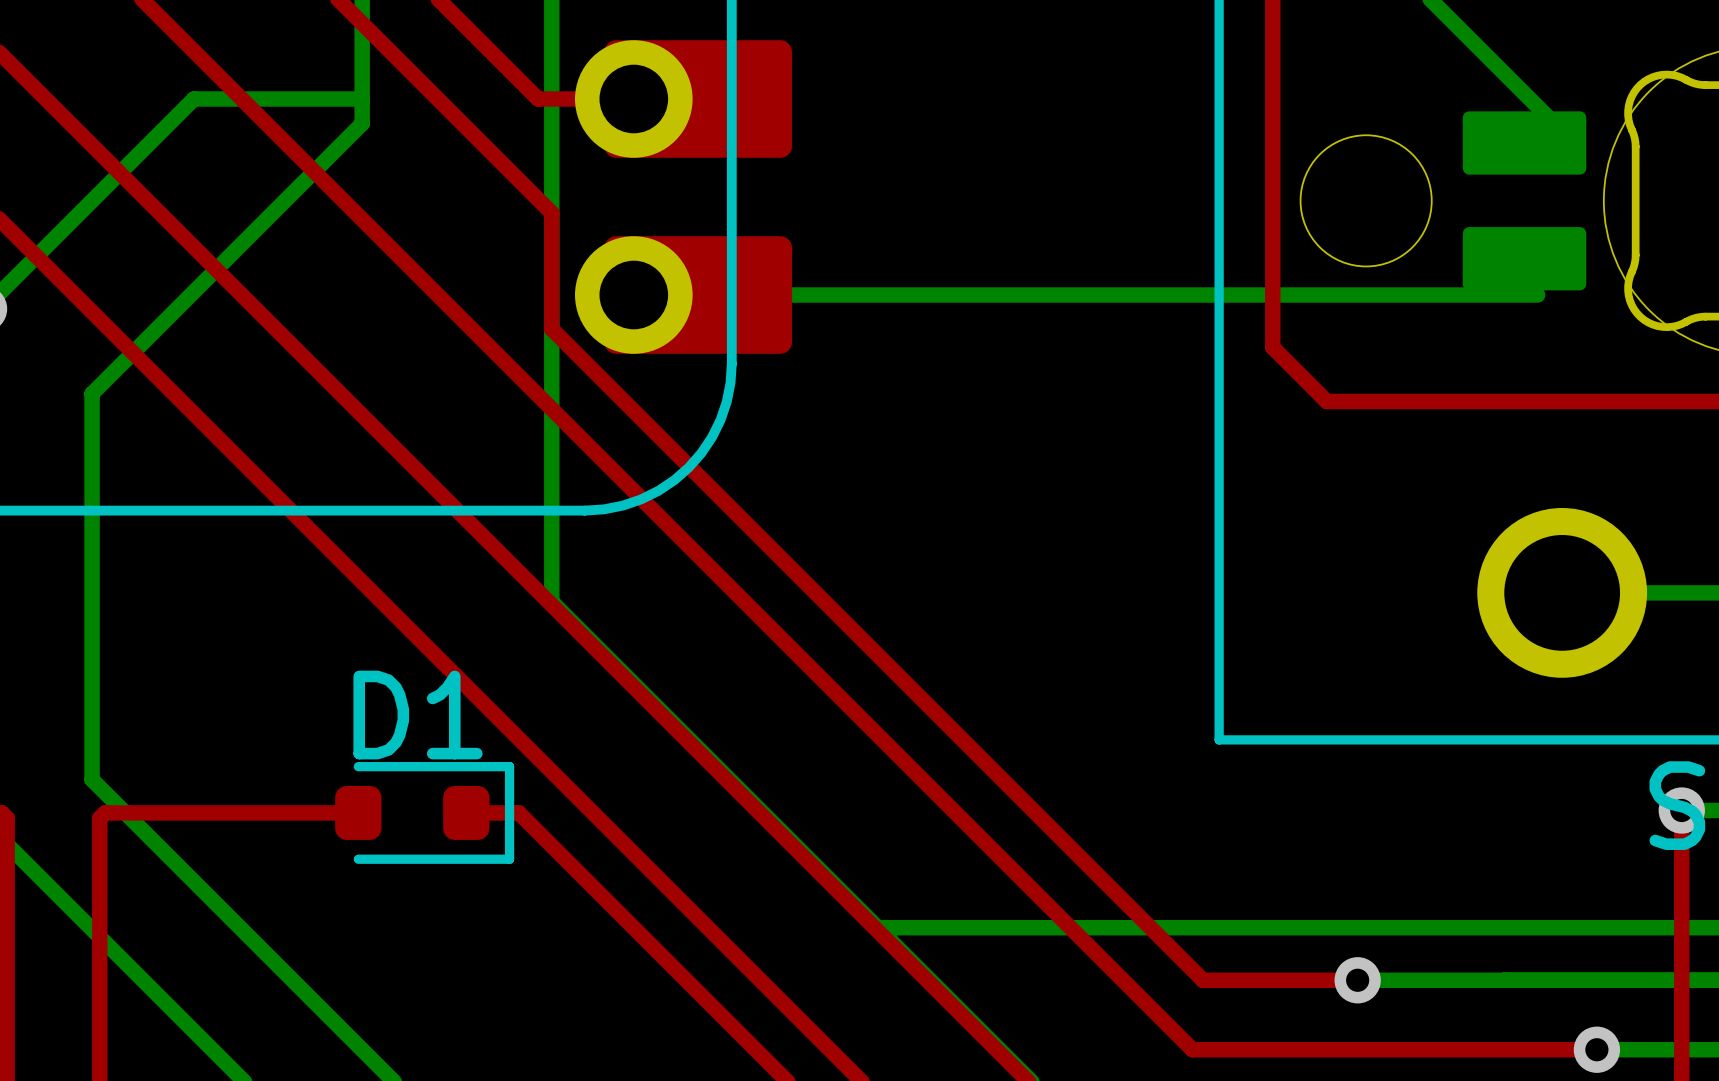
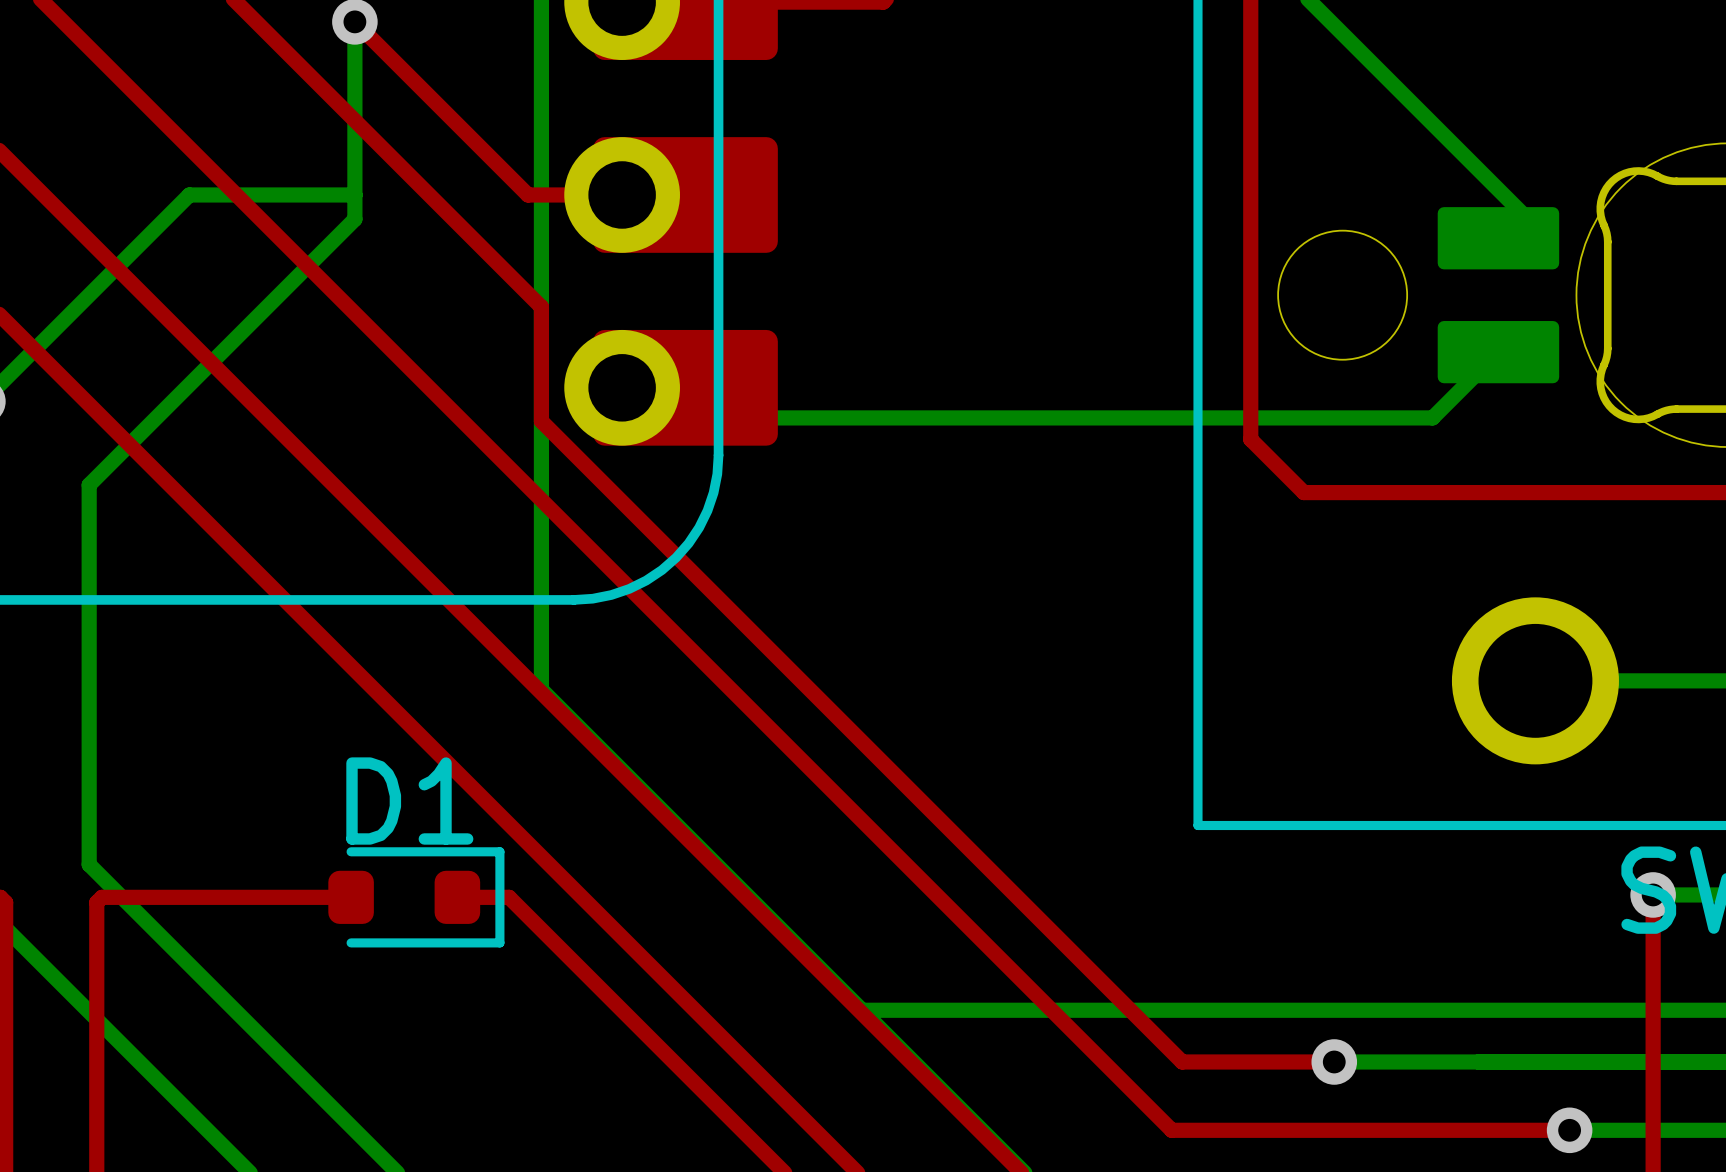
bottom track: (633, 295) (1537, 295) -> (622, 387) (652, 417) (1432, 417) (1498, 352)

